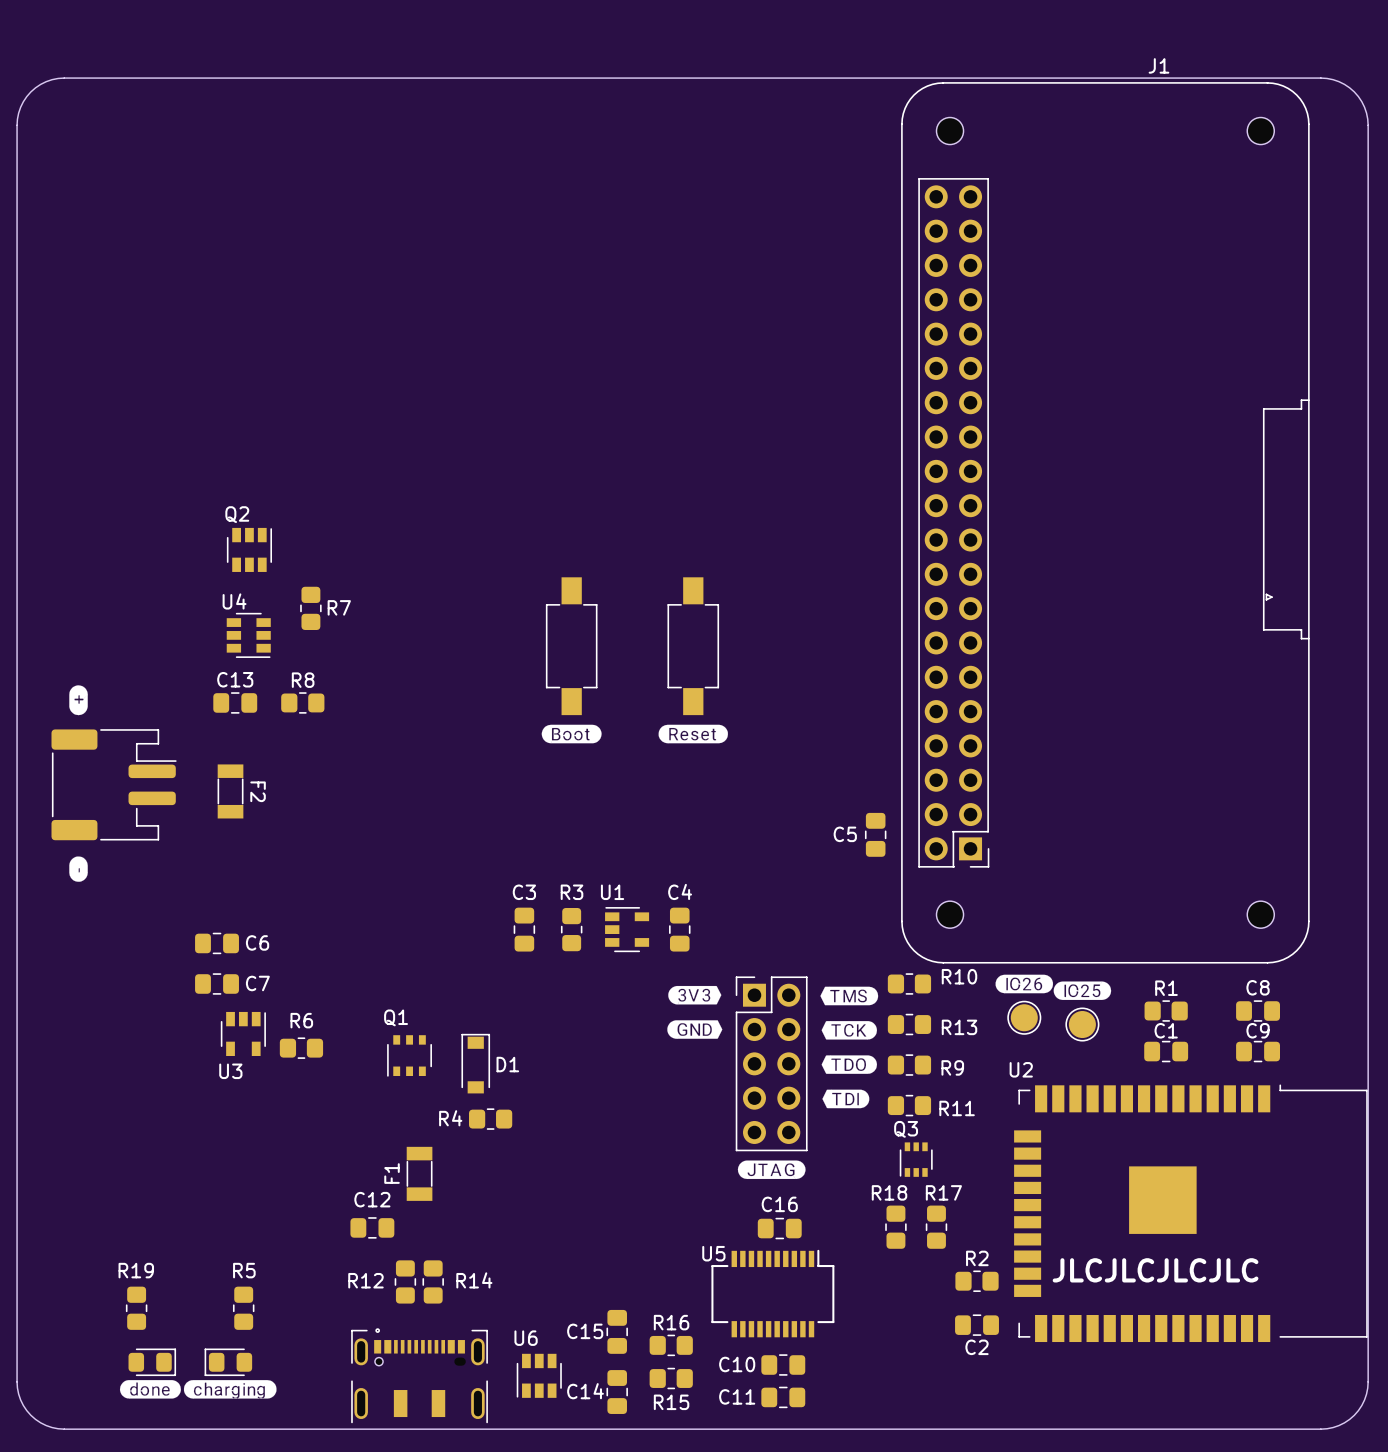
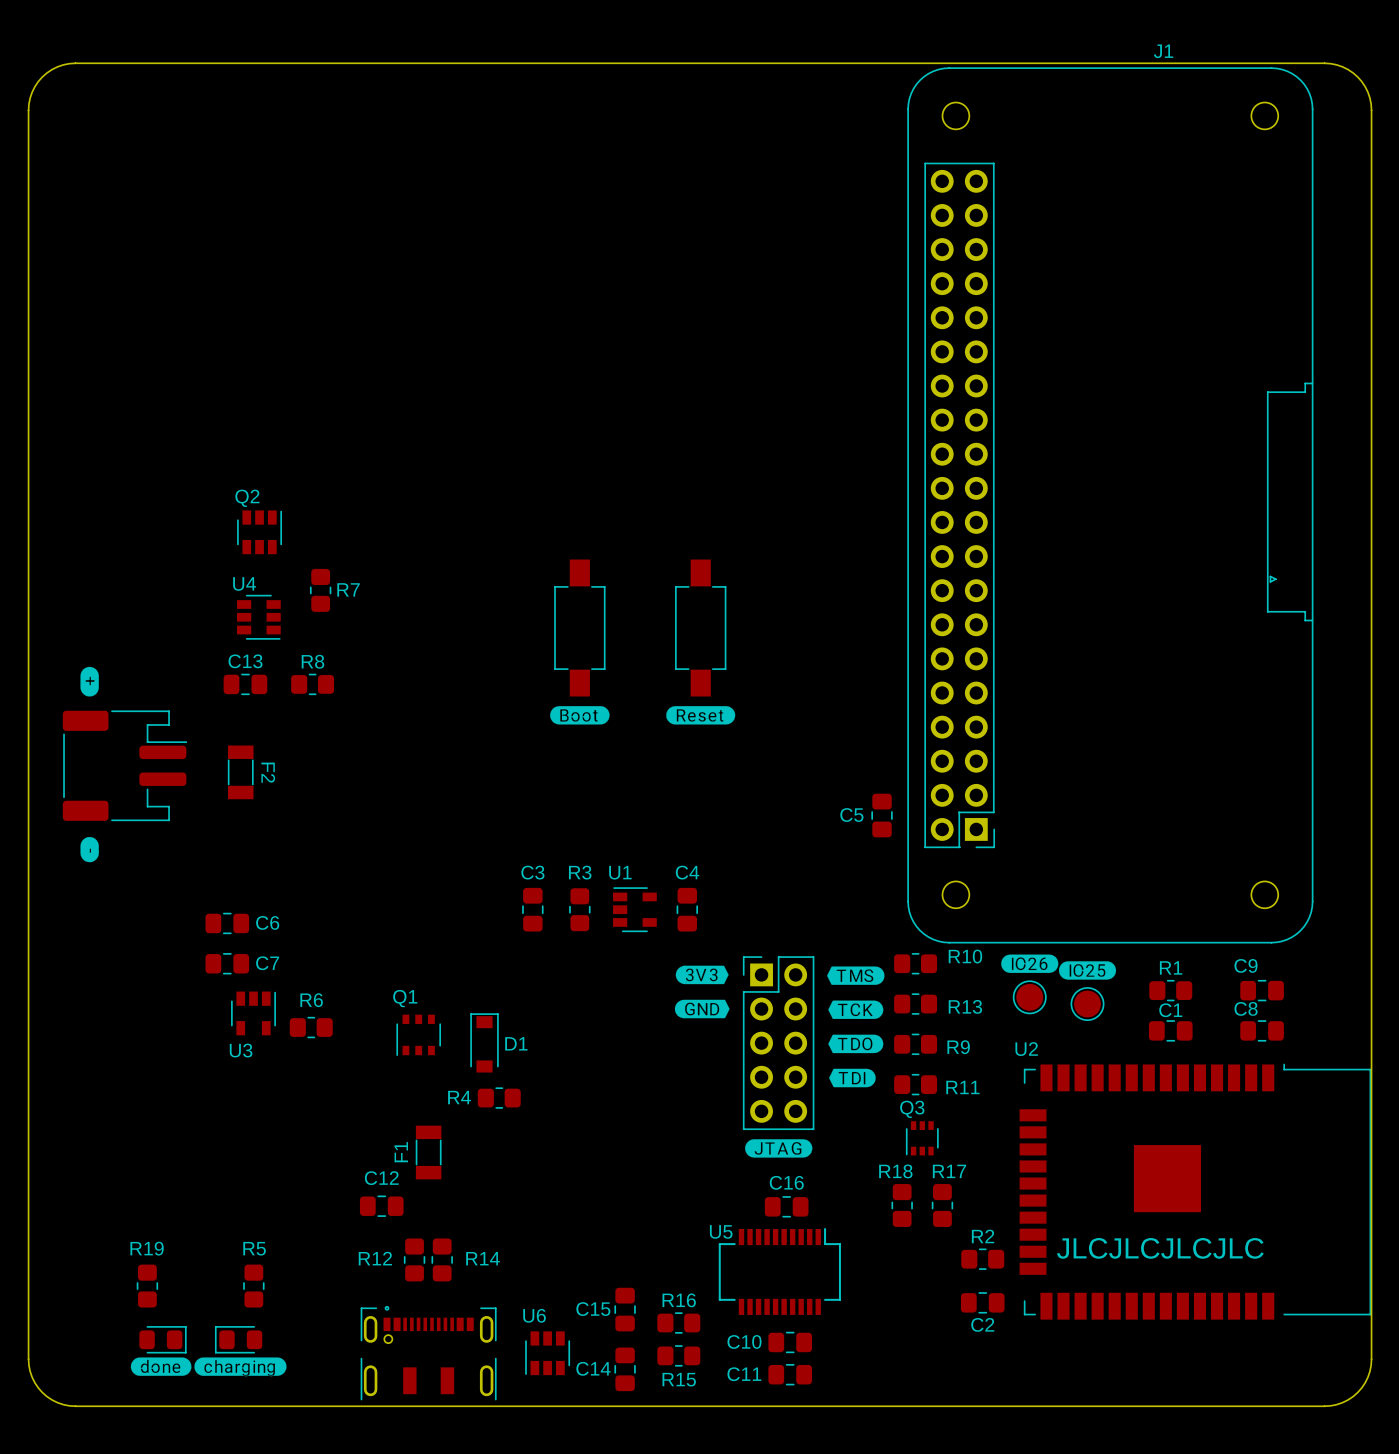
C8 name: C8 (1258, 987) -> C9 (1246, 965)
C9 name: C9 (1258, 1030) -> C8 (1246, 1008)

